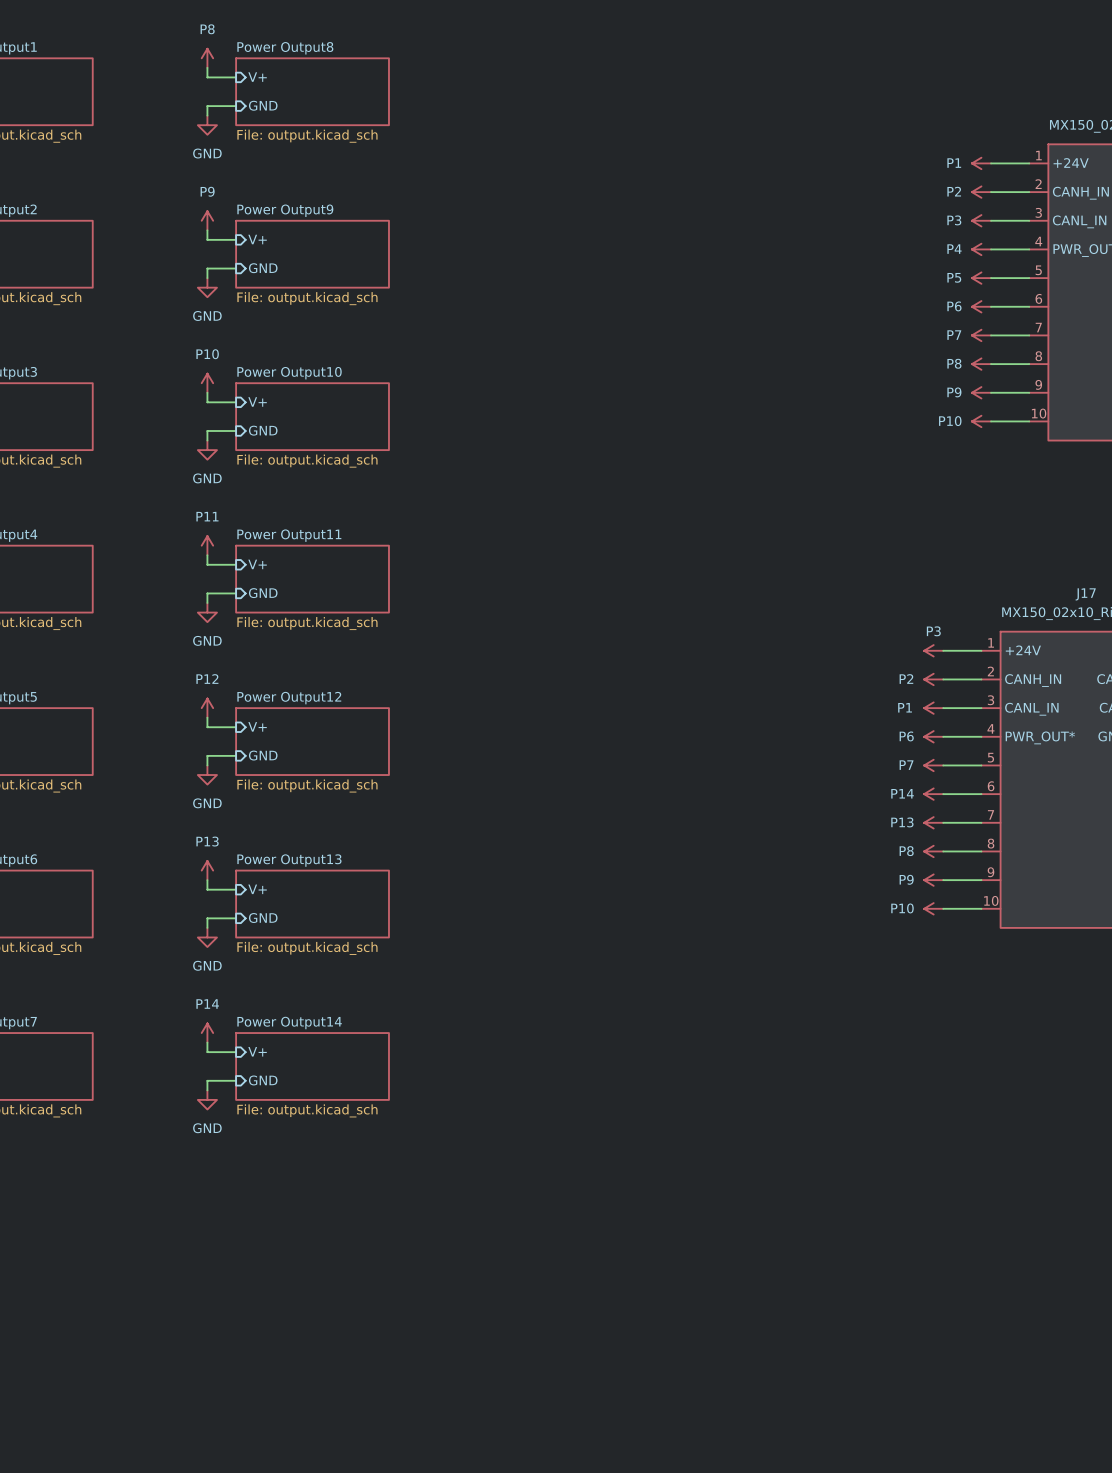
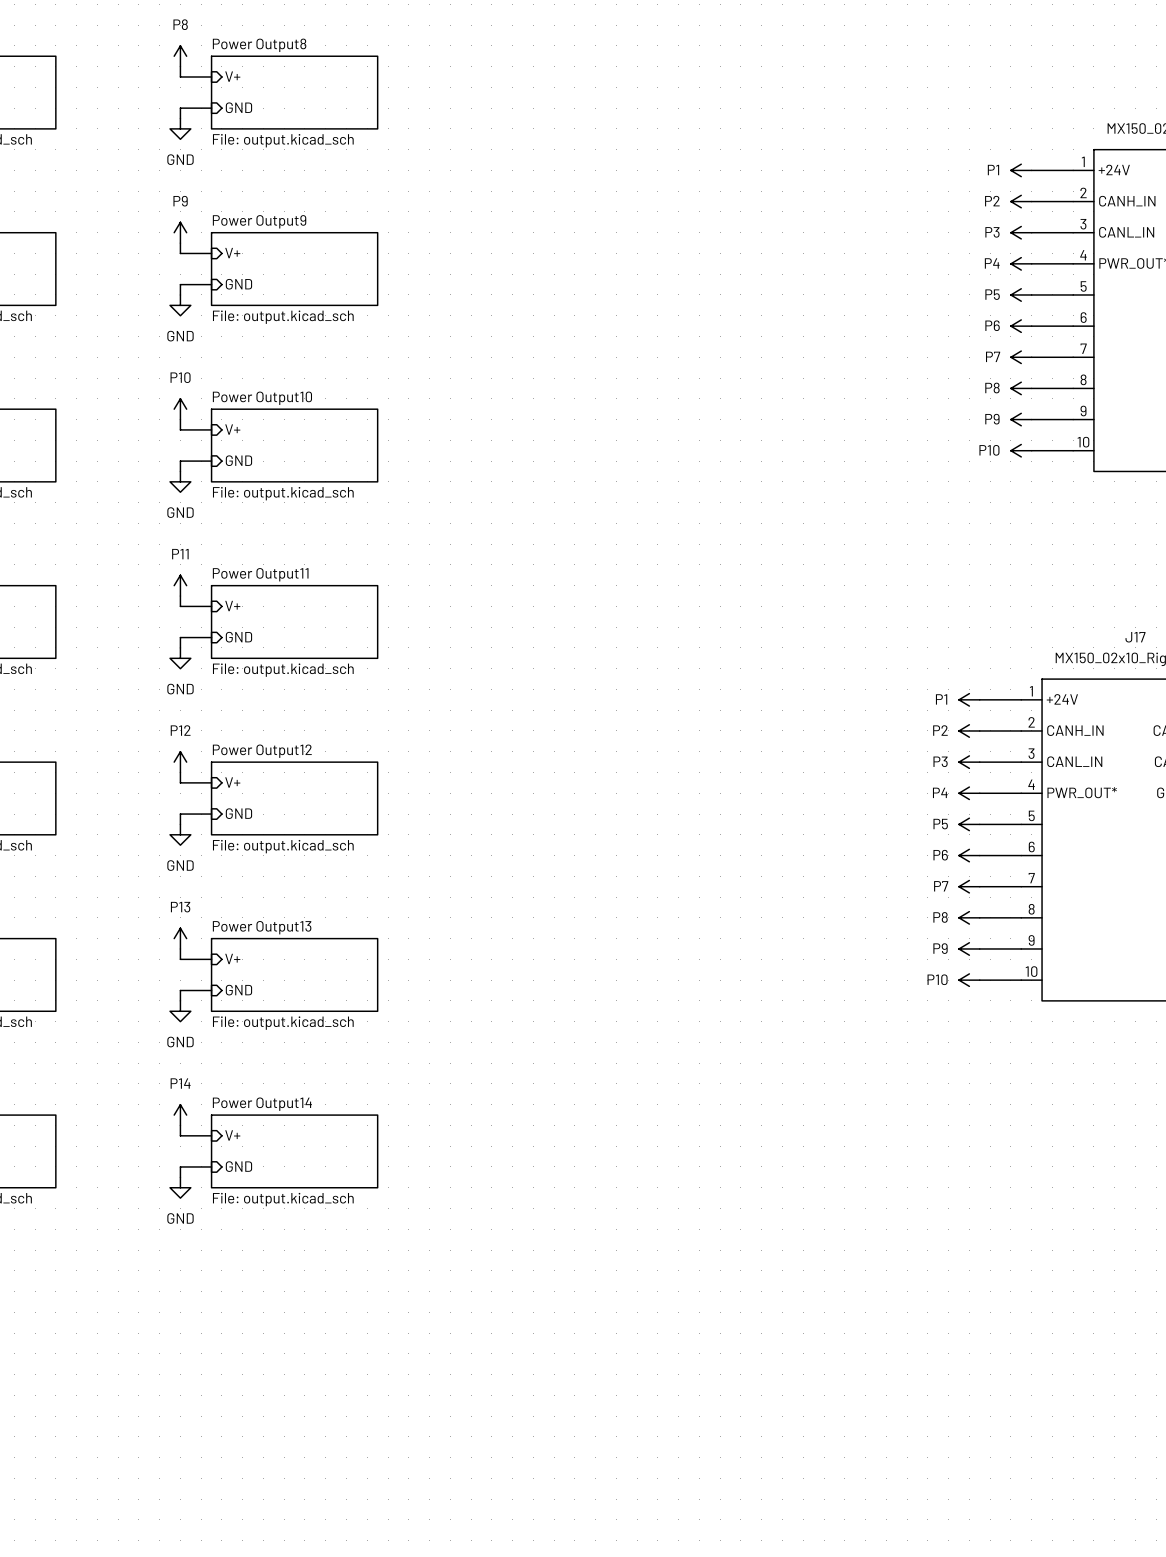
power symbol: P3 (933, 650) -> P1 (969, 699)
power symbol: P1 (933, 708) -> P3 (969, 762)
power symbol: P6 (933, 736) -> P4 (969, 793)
power symbol: P7 (933, 765) -> P5 (969, 824)
power symbol: P14 (933, 794) -> P6 (969, 855)
power symbol: P13 (933, 822) -> P7 (969, 886)

